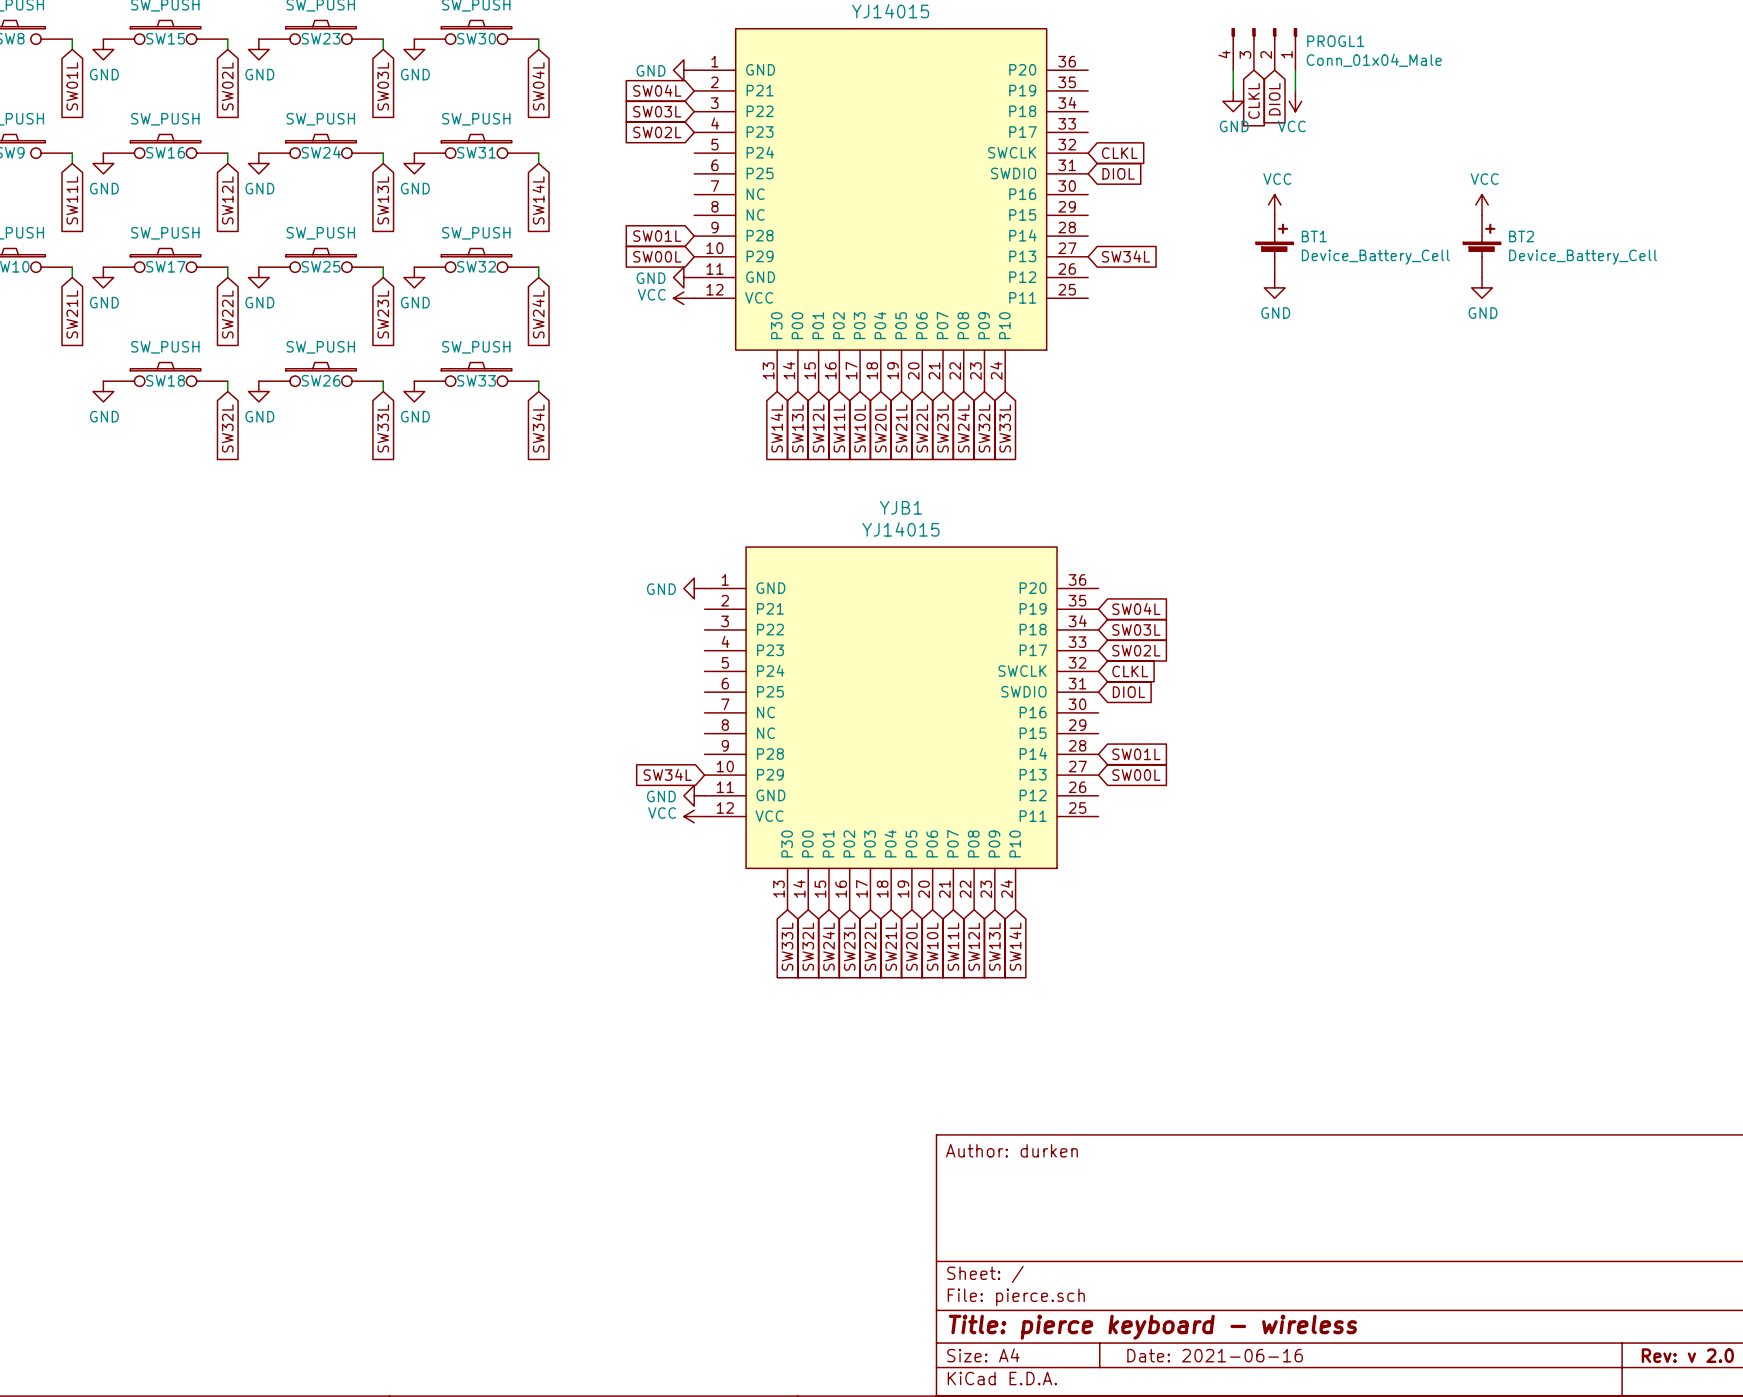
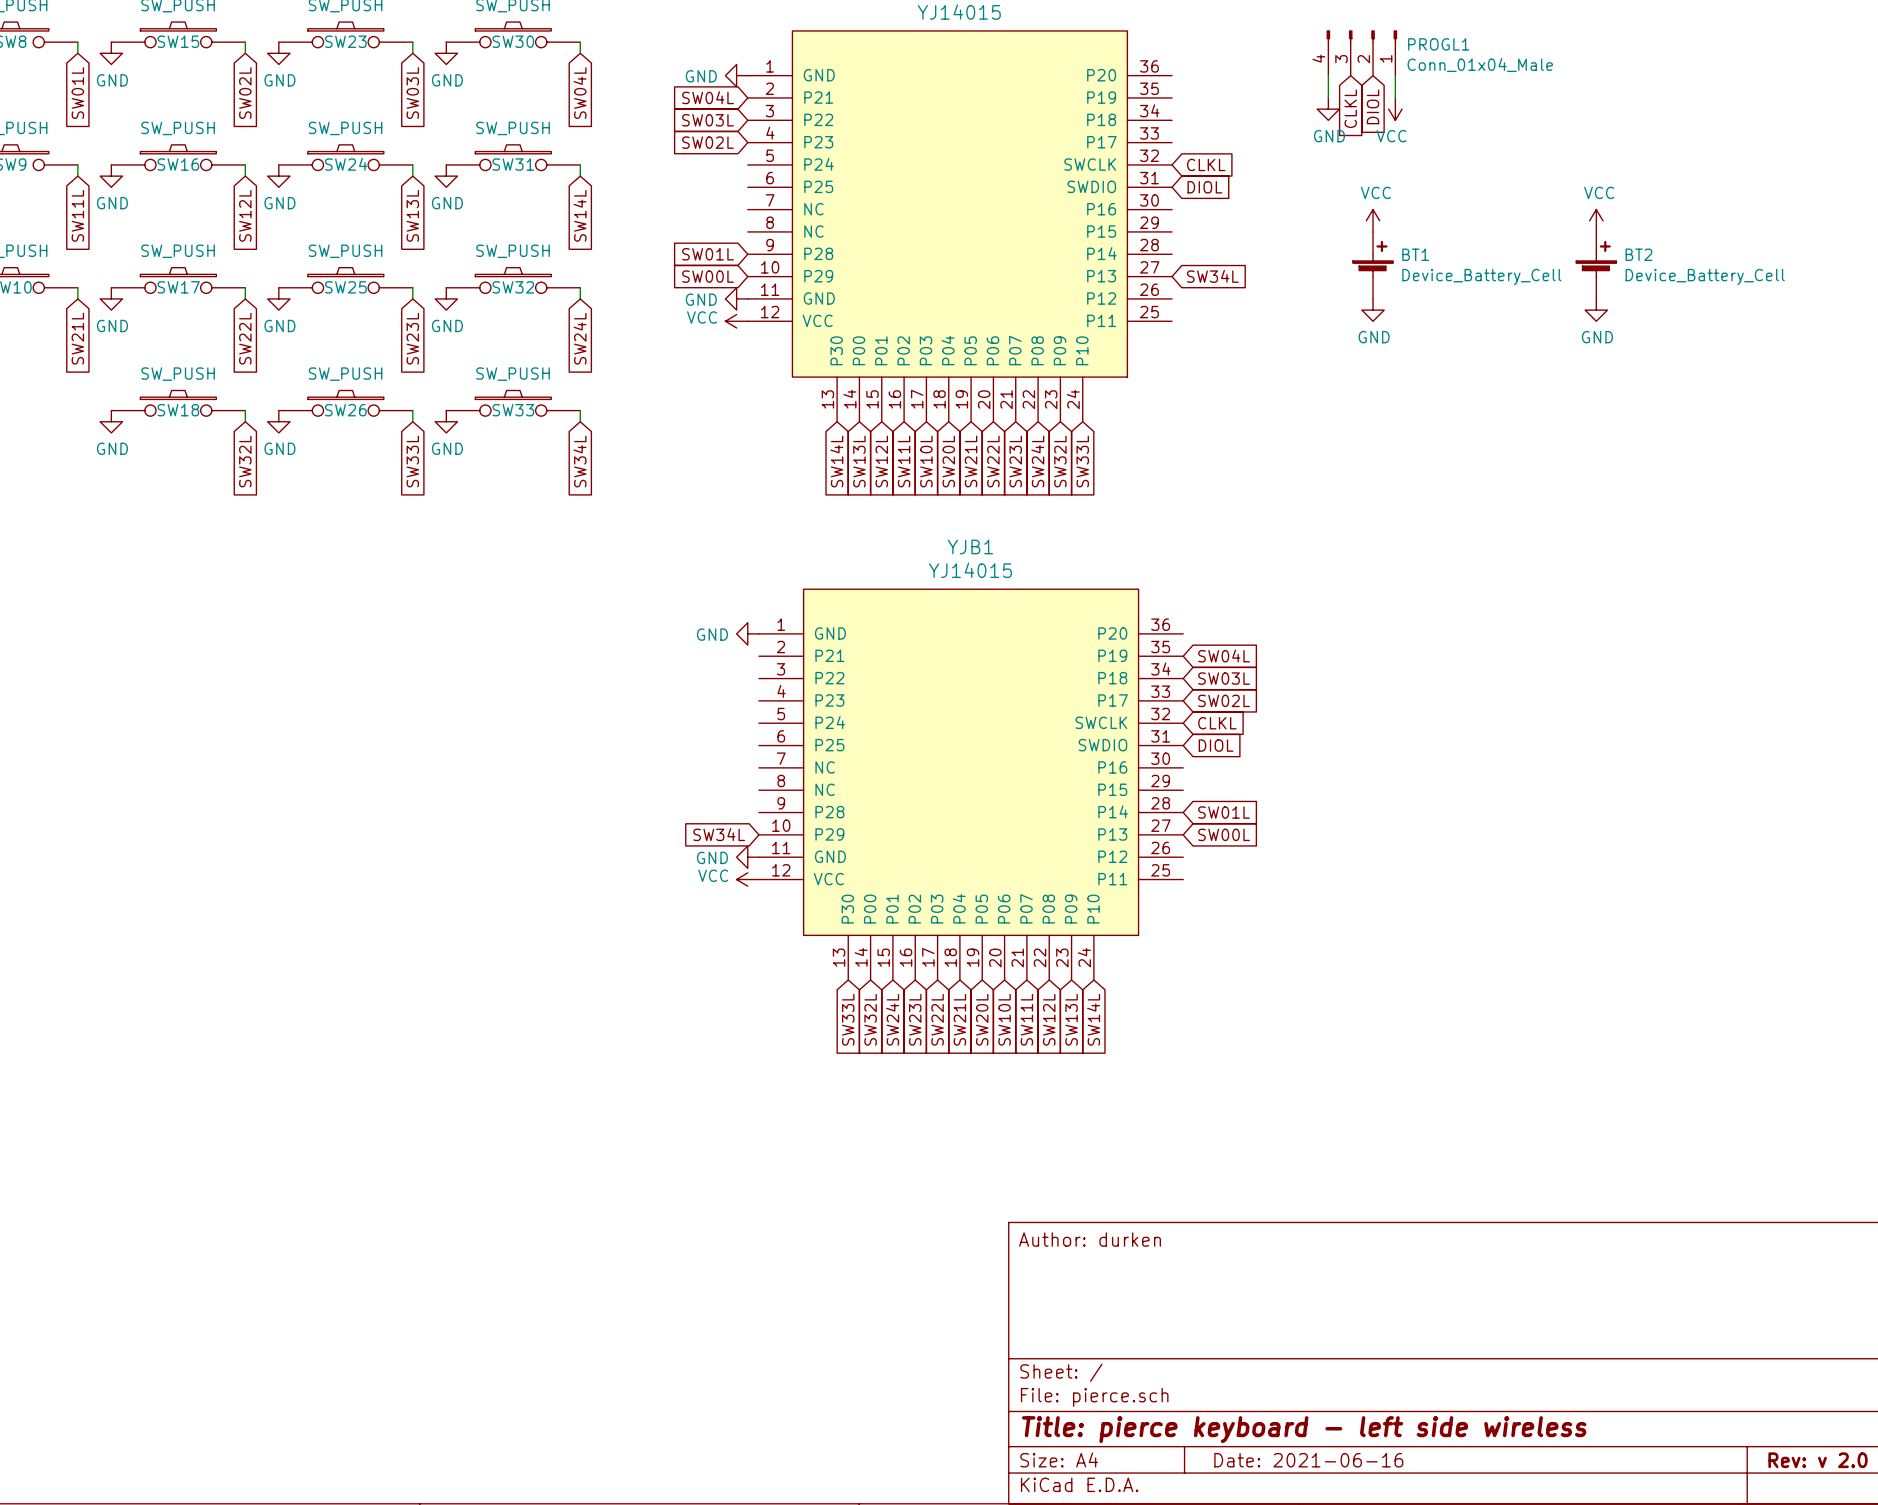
title block: Title: pierce keyboard - wireless (1152, 1327) -> Title: pierce keyboard - left side wireless (1304, 1429)

